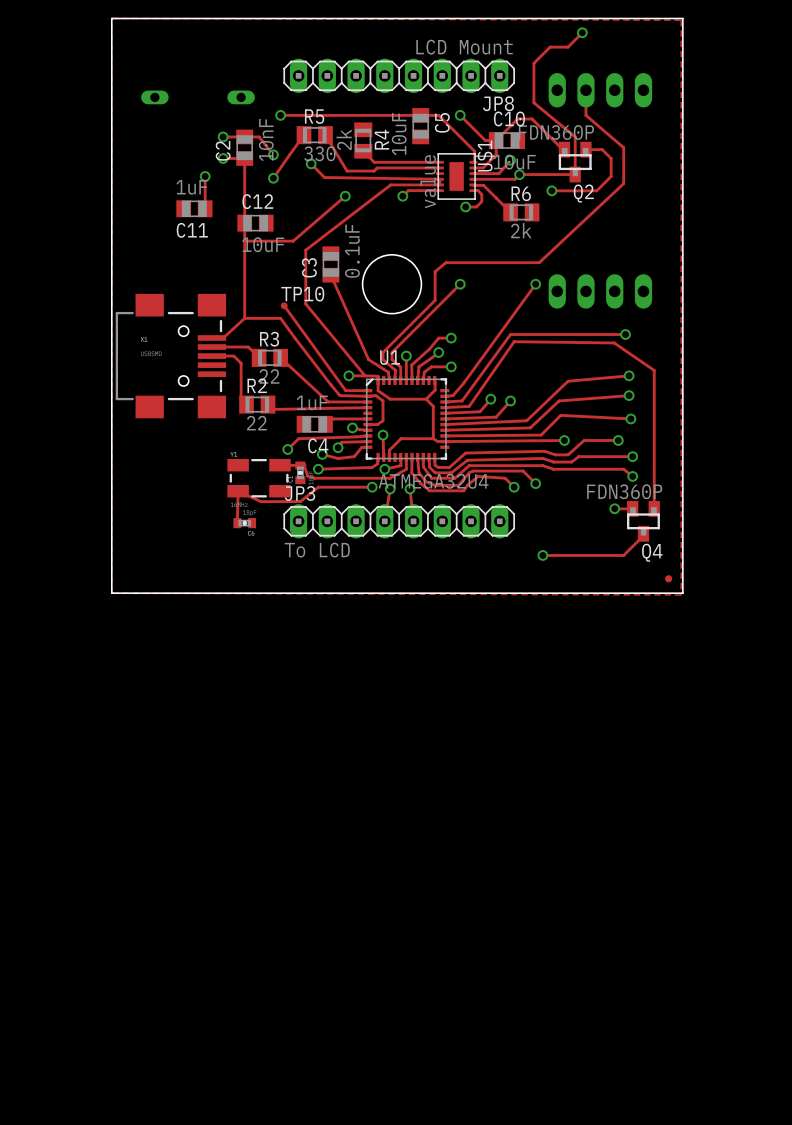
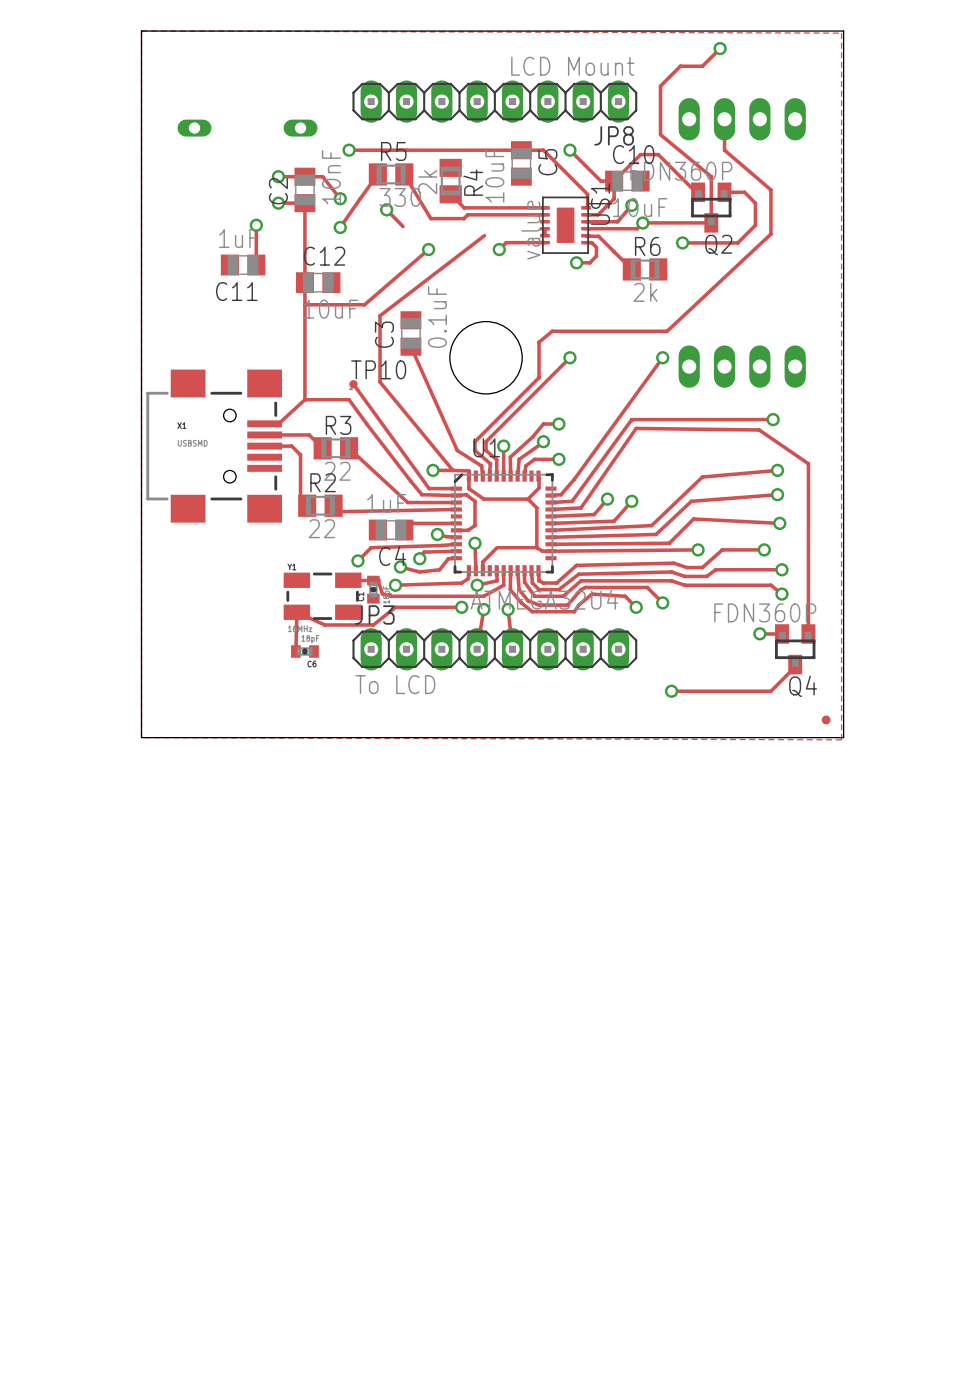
track: (324, 177) (439, 179) -> none
track: (390, 184) (439, 184) -> none

